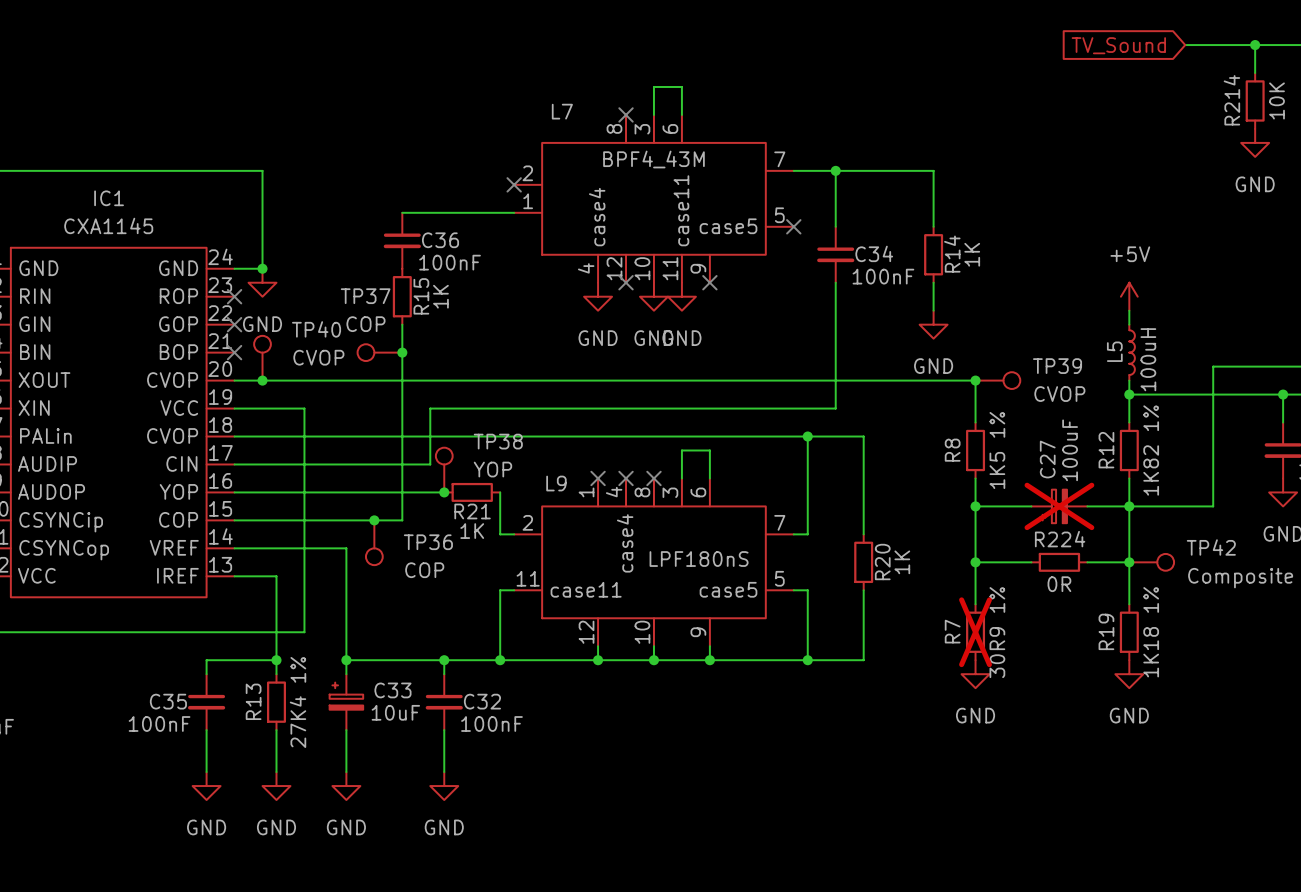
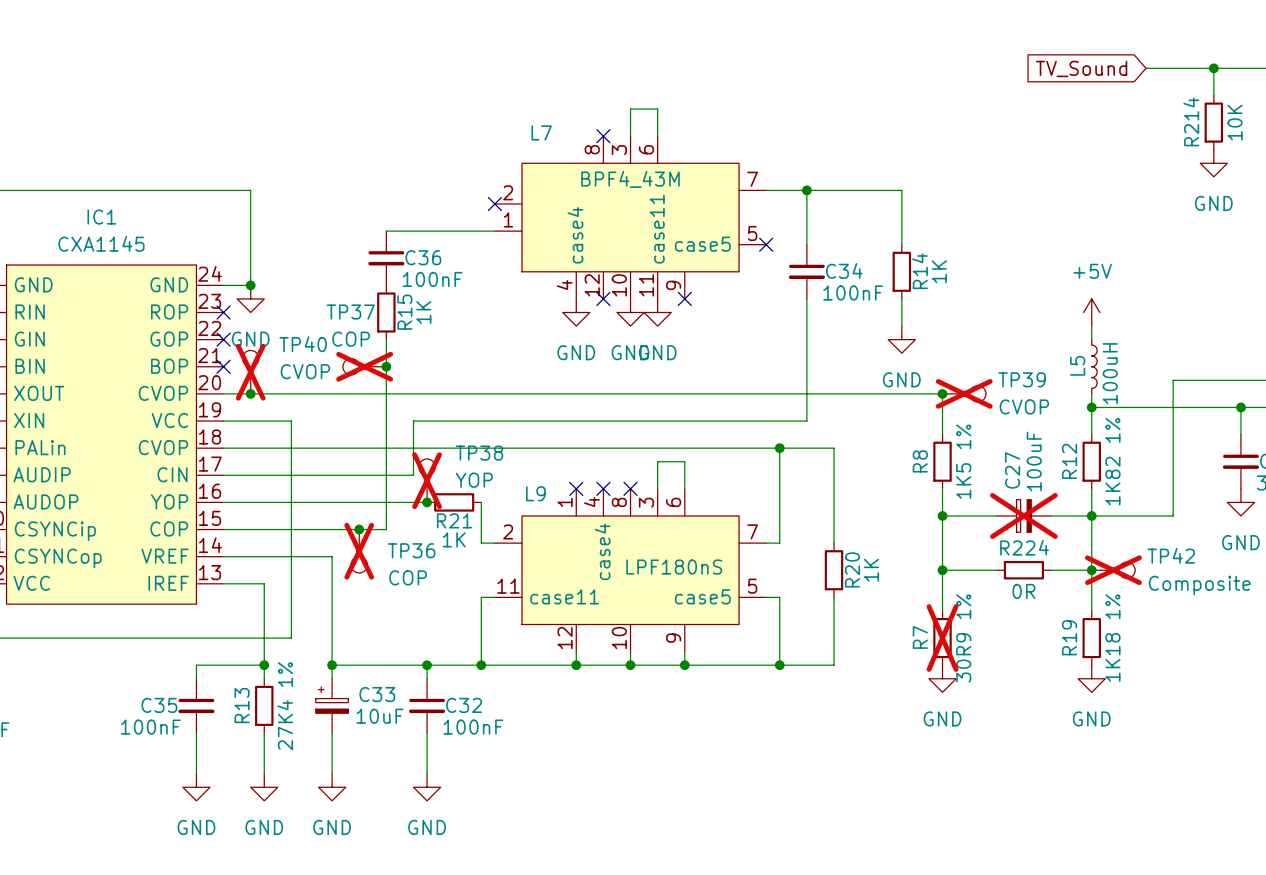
TP37 do-not-place cross: none -> (364, 366)
TP40 do-not-place cross: none -> (250, 372)
TP39 do-not-place cross: none -> (964, 393)
TP38 do-not-place cross: none -> (427, 480)
TP36 do-not-place cross: none -> (359, 551)
TP42 do-not-place cross: none -> (1113, 570)

